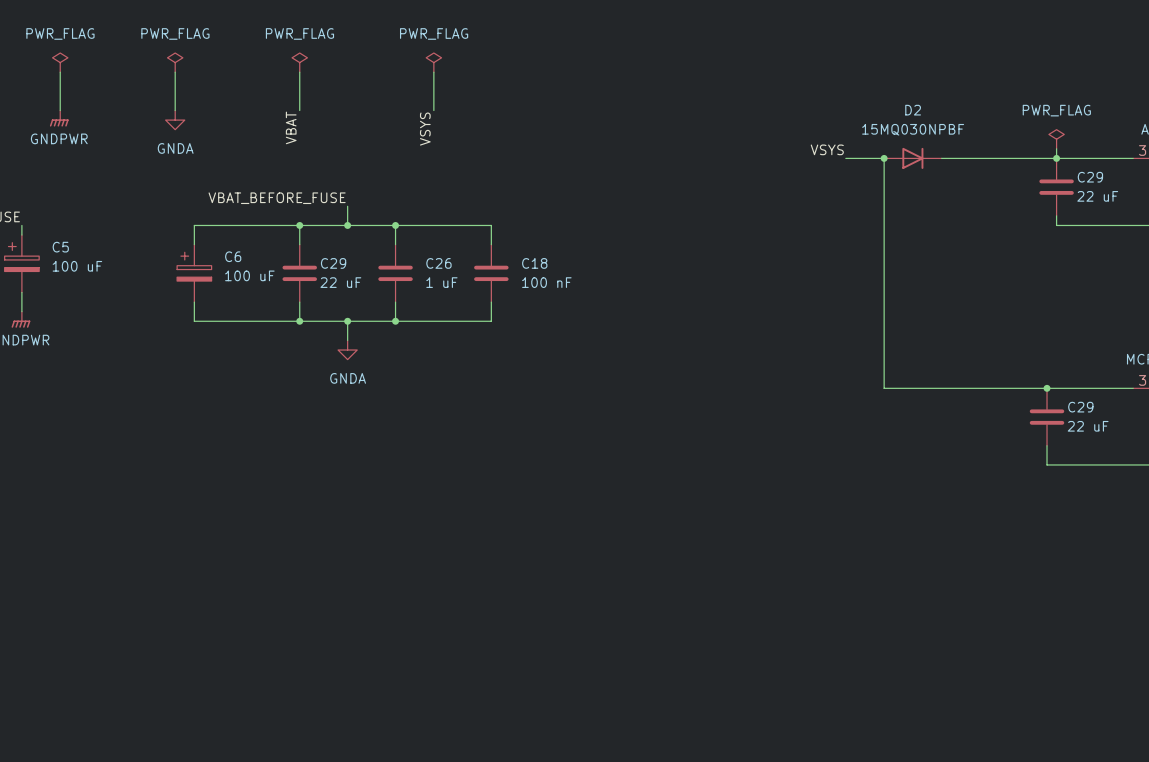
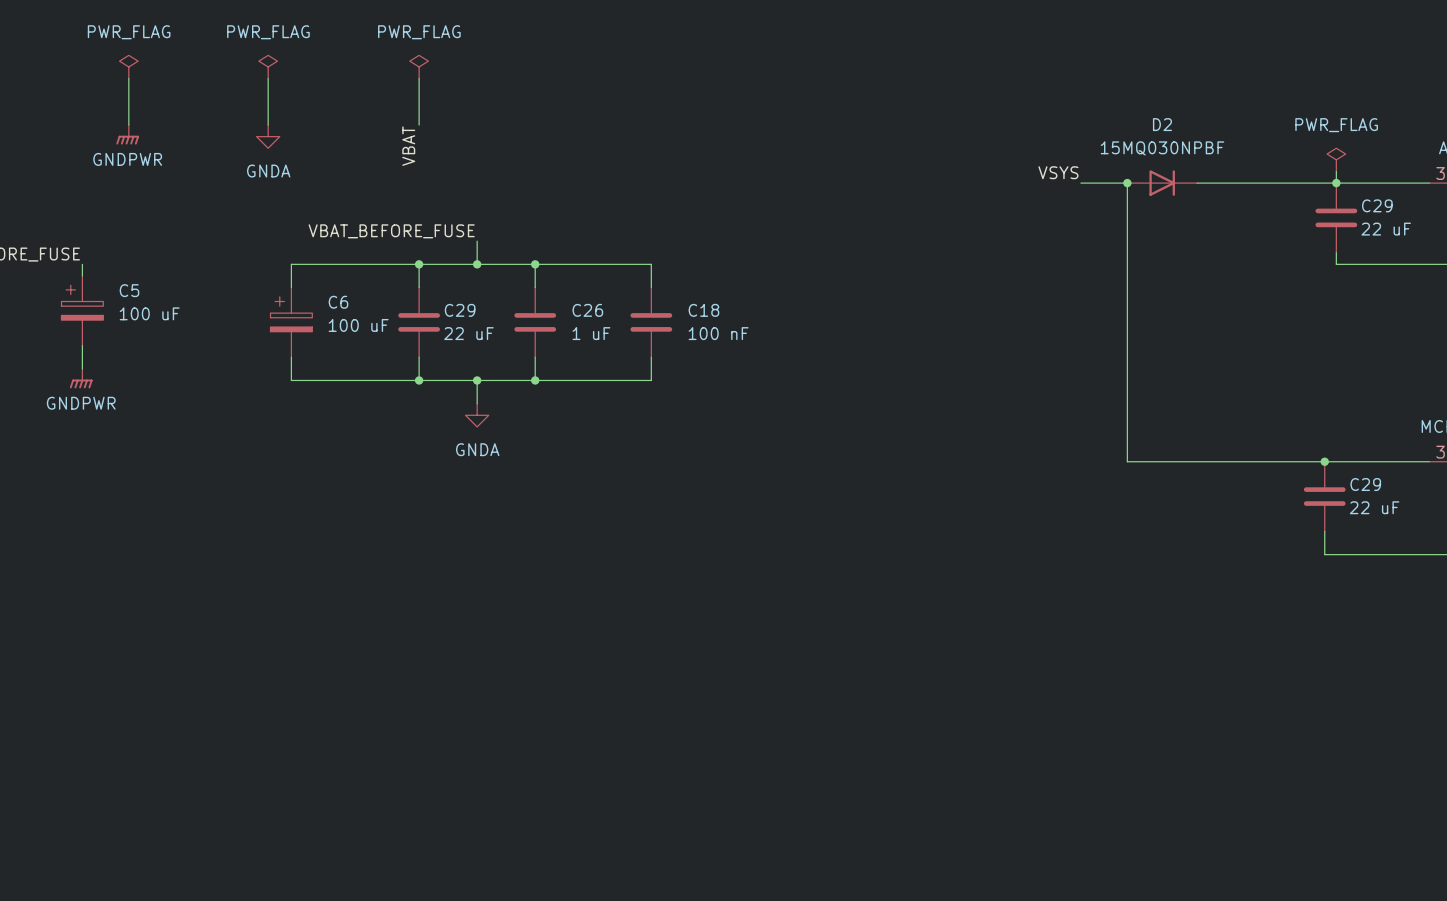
power symbol: PWR_FLAG (433, 62) -> none
wire: (433, 72) (433, 110) -> none
label: VSYS (425, 129) -> none

